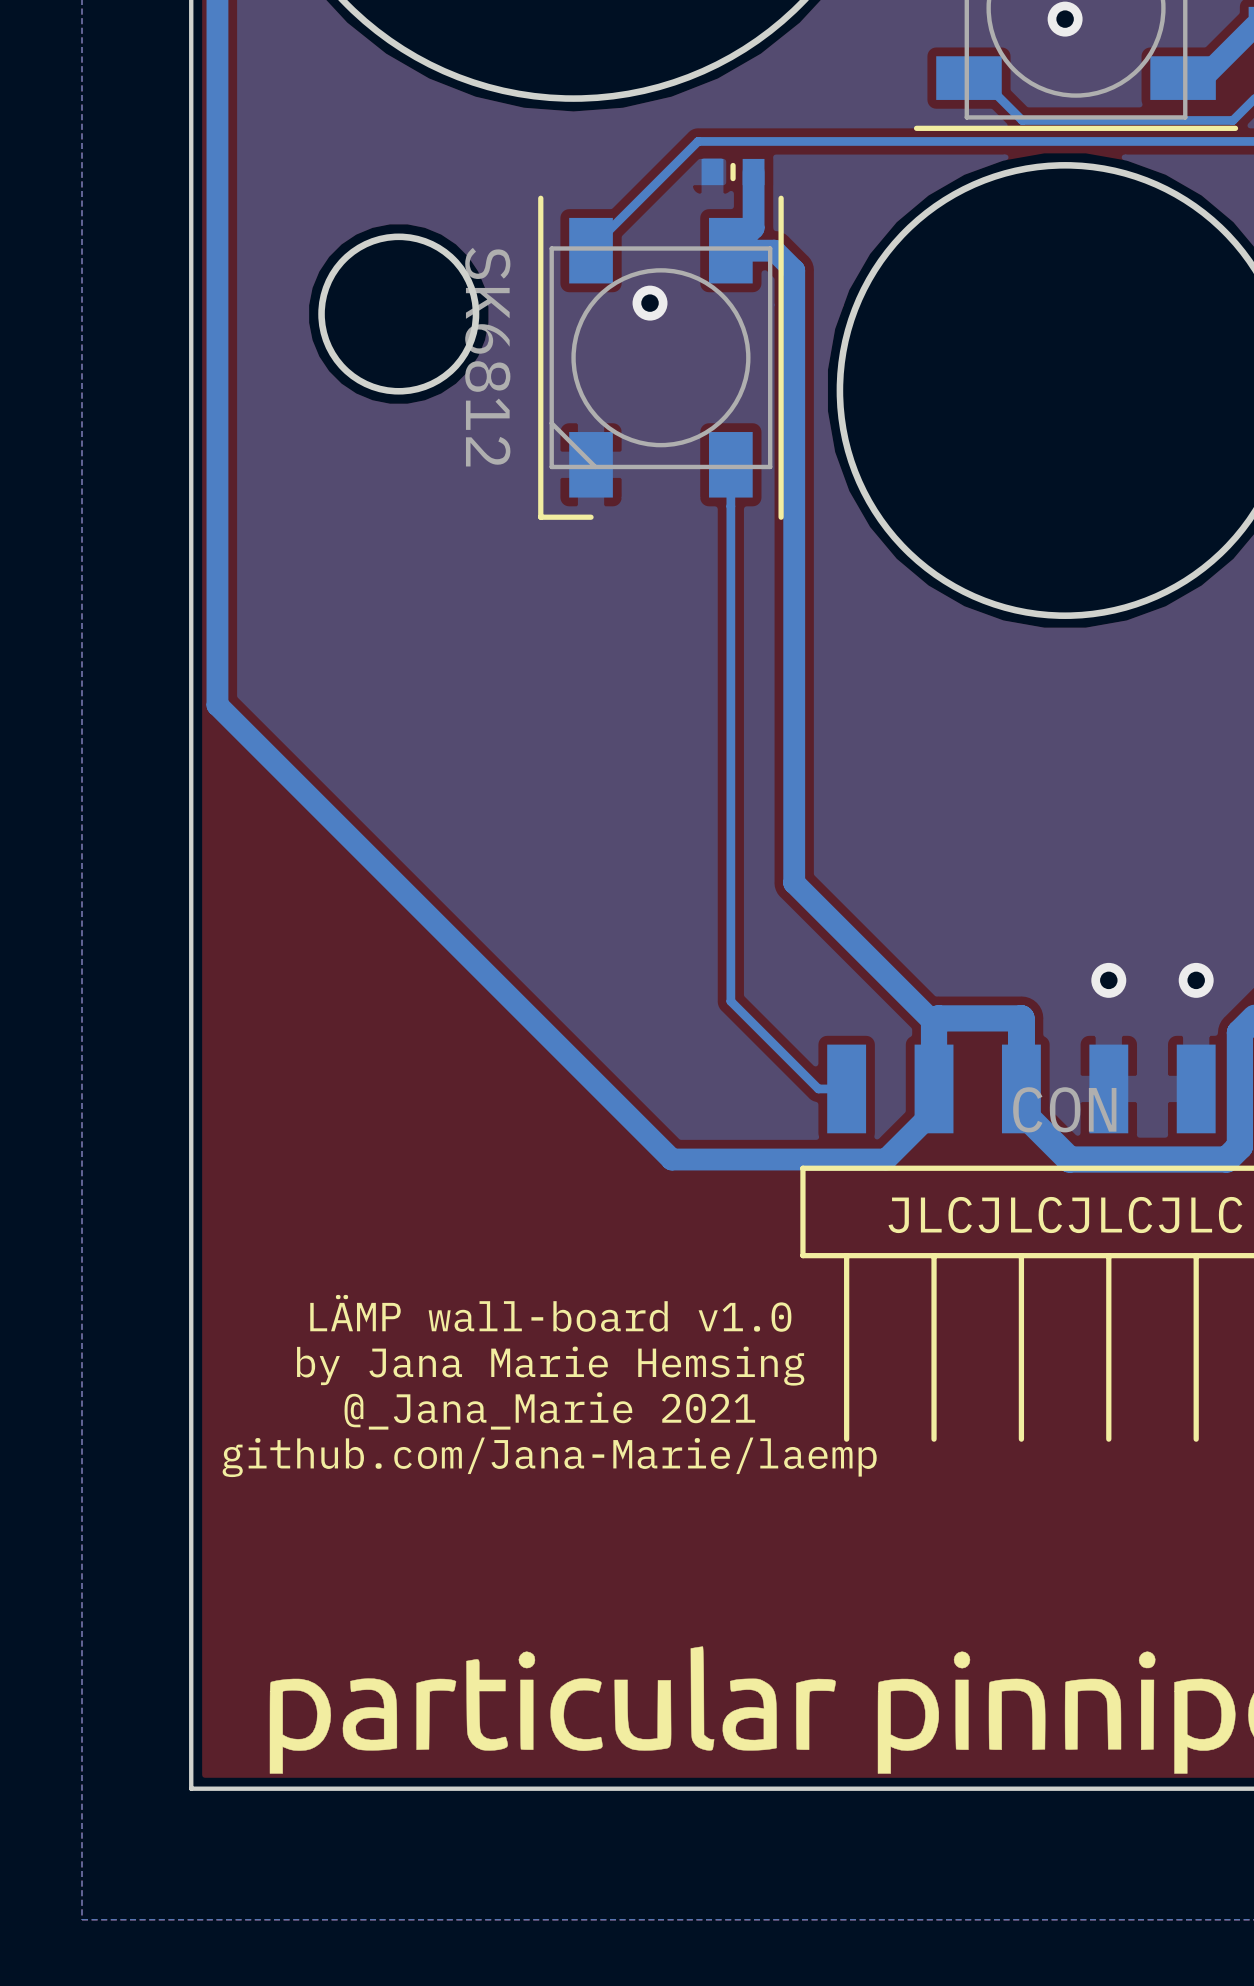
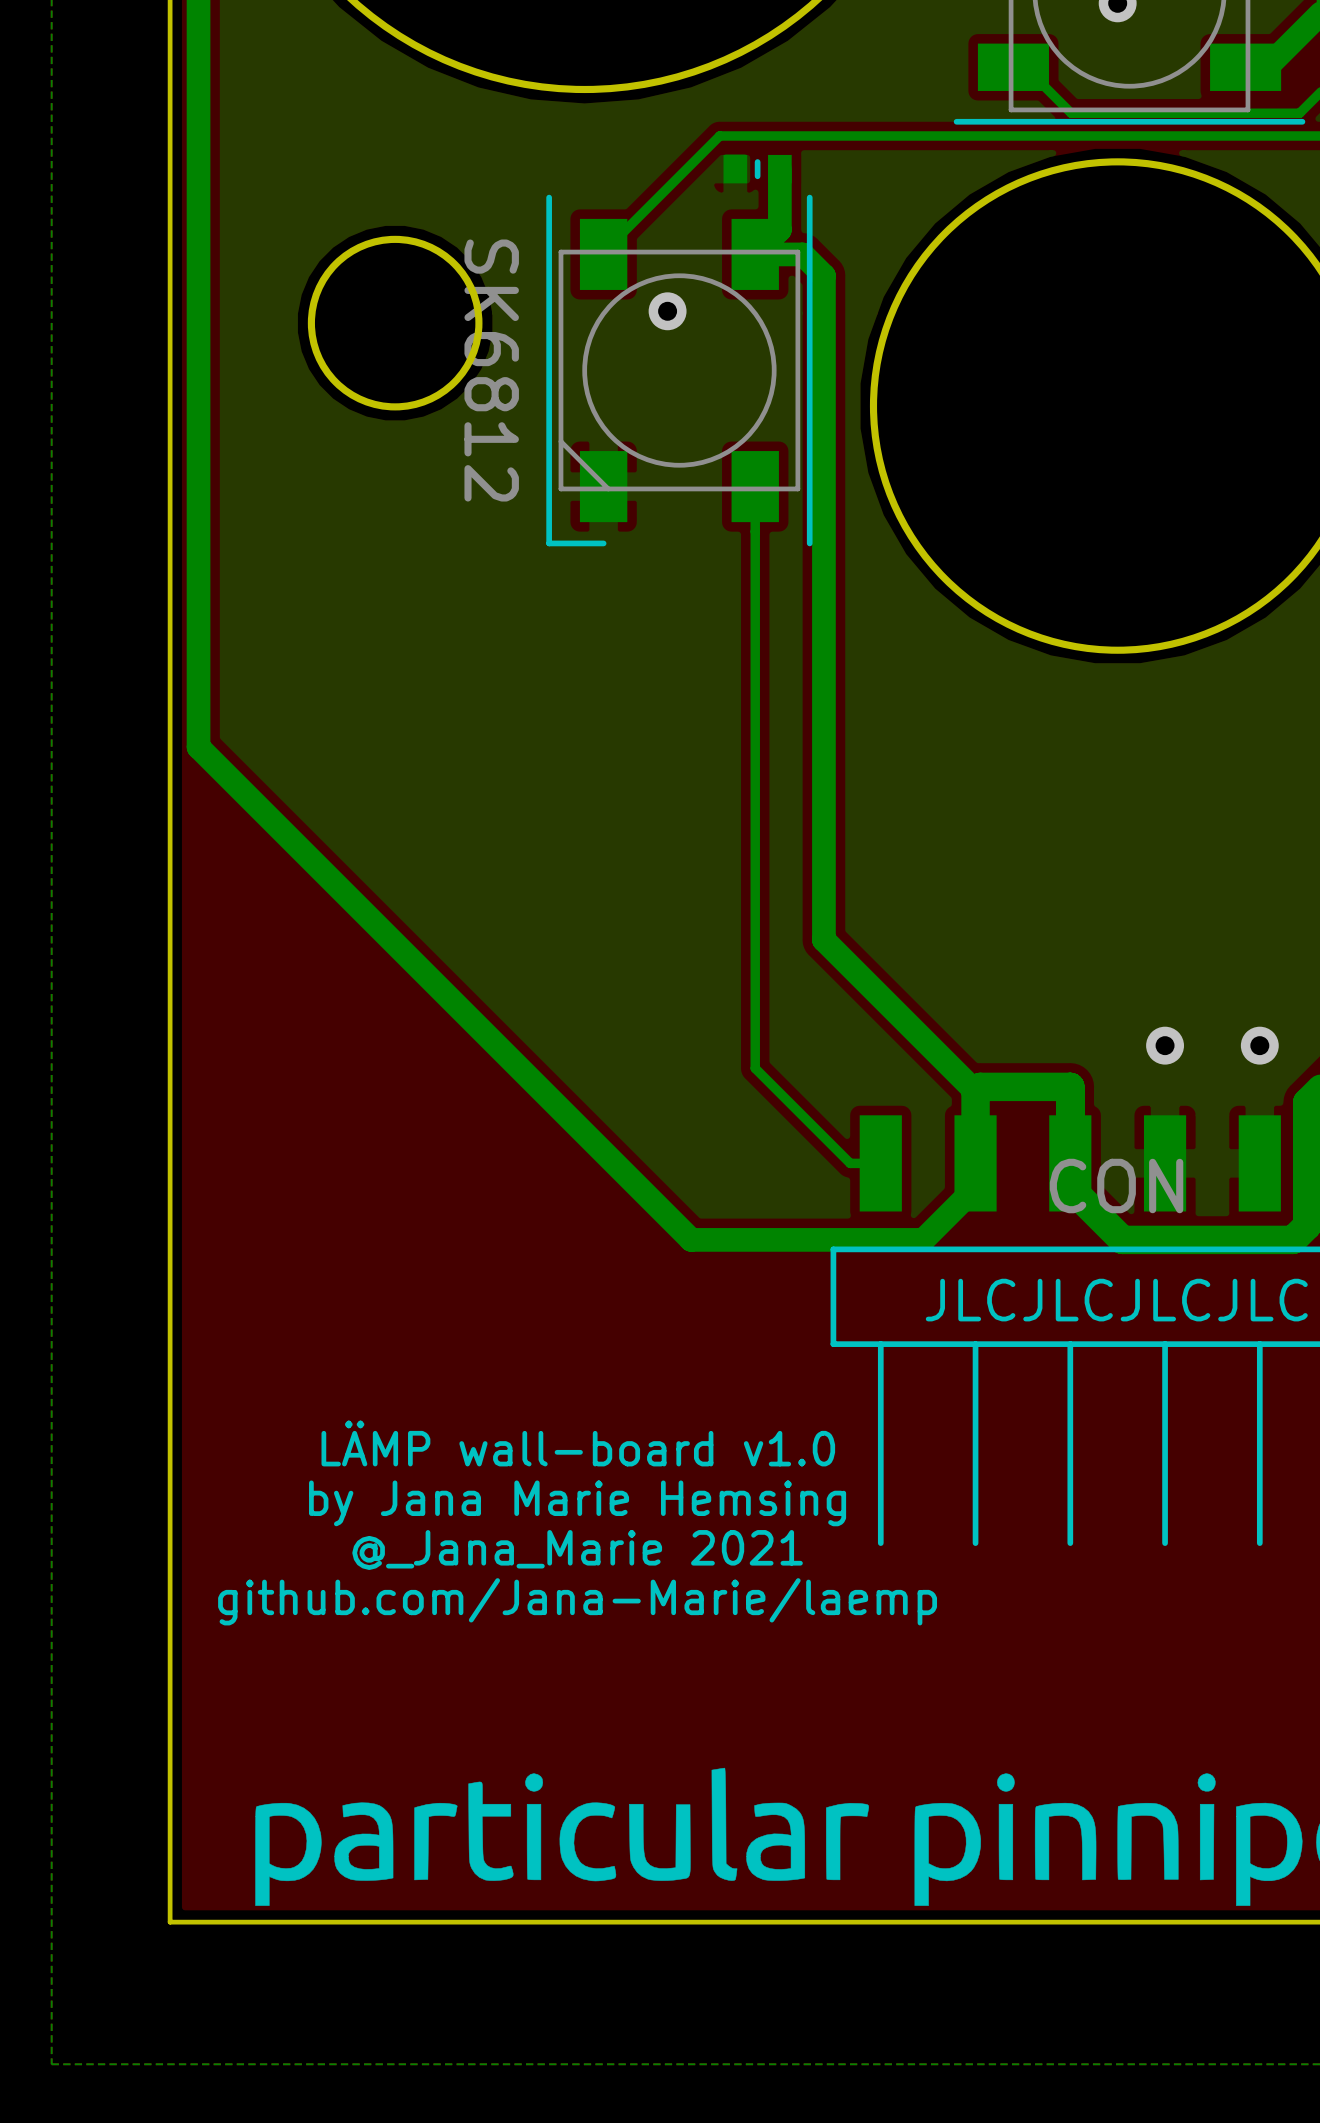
text position: LÄMP wall-board v1.0 (550, 1313) -> LÄMP wall-board v1.0 (578, 1443)
text position: by Jana Marie Hemsing (550, 1366) -> by Jana Marie Hemsing (577, 1503)
text position: @_Jana_Marie 2021 (549, 1410) -> @_Jana_Marie 2021 (577, 1550)
text position: github.com/Jana-Marie/laemp (549, 1457) -> github.com/Jana-Marie/laemp (577, 1601)

